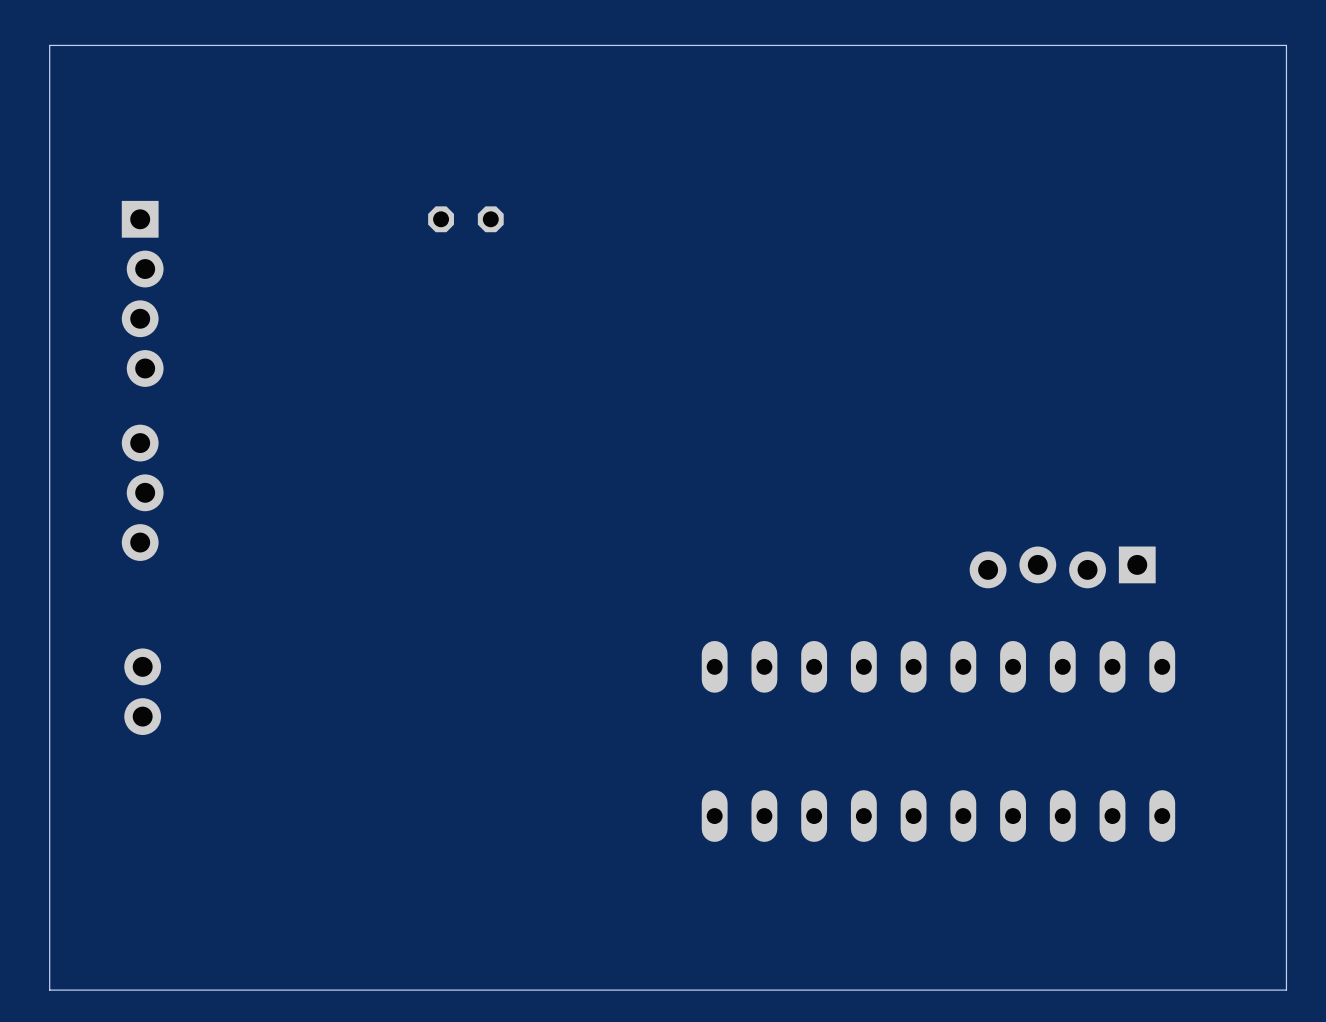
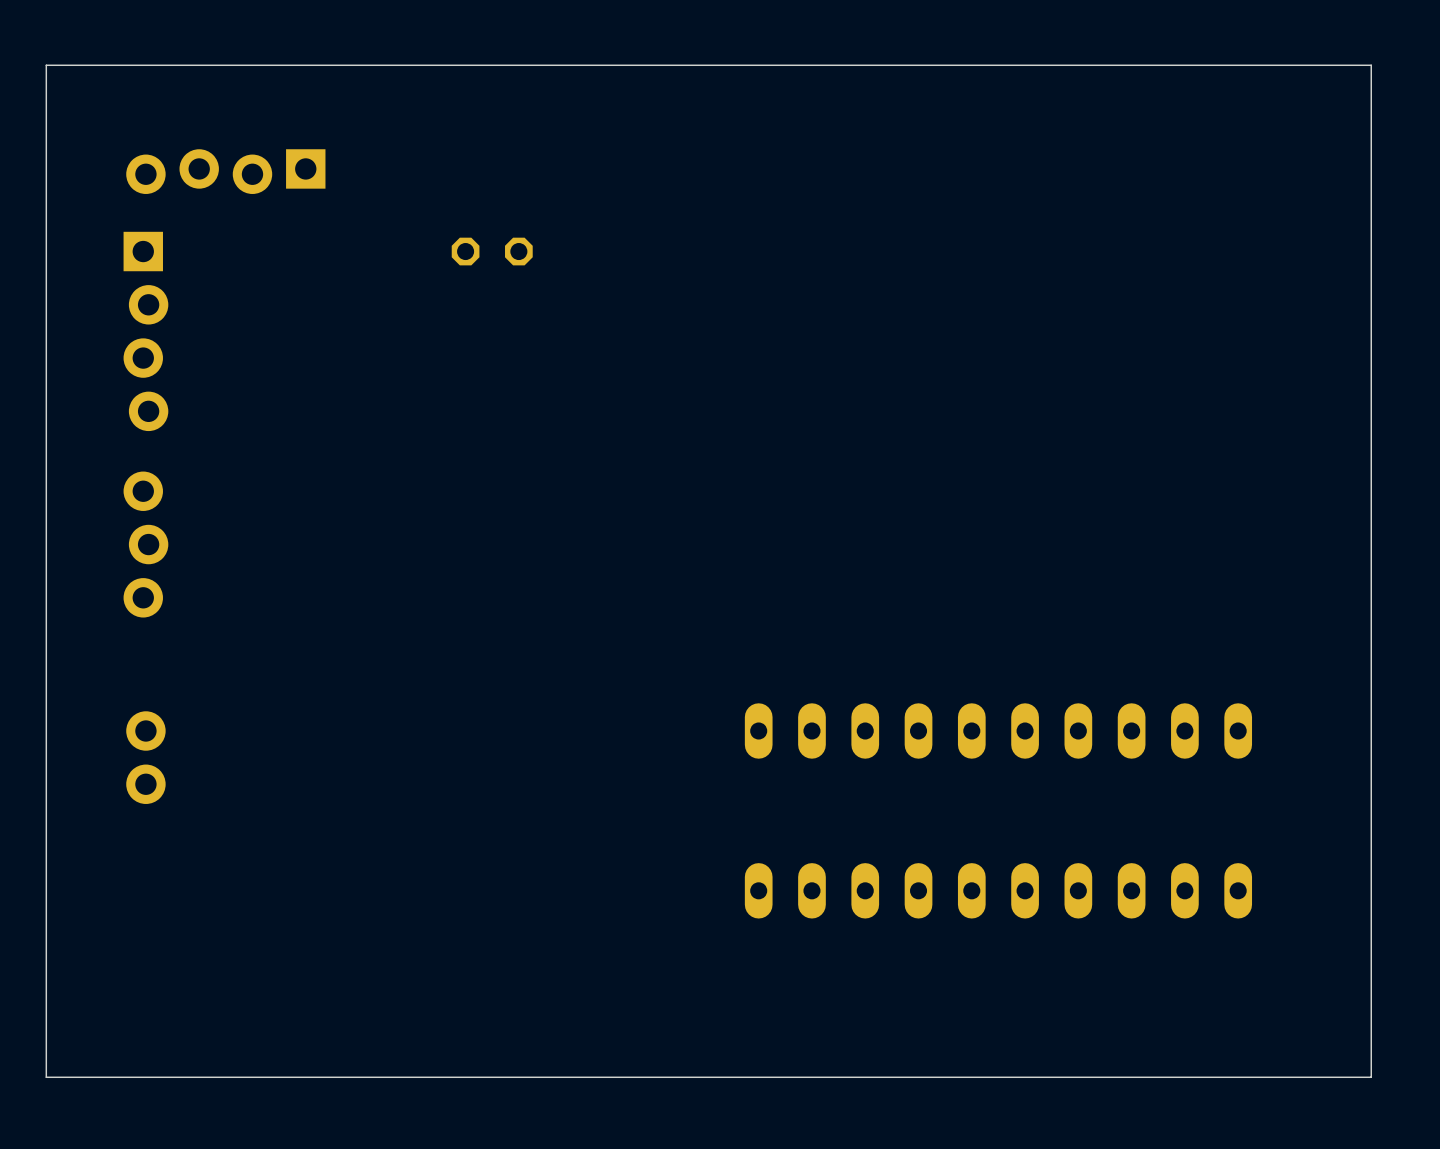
part: none -> (225, 171)
part: (1062, 567) -> none

